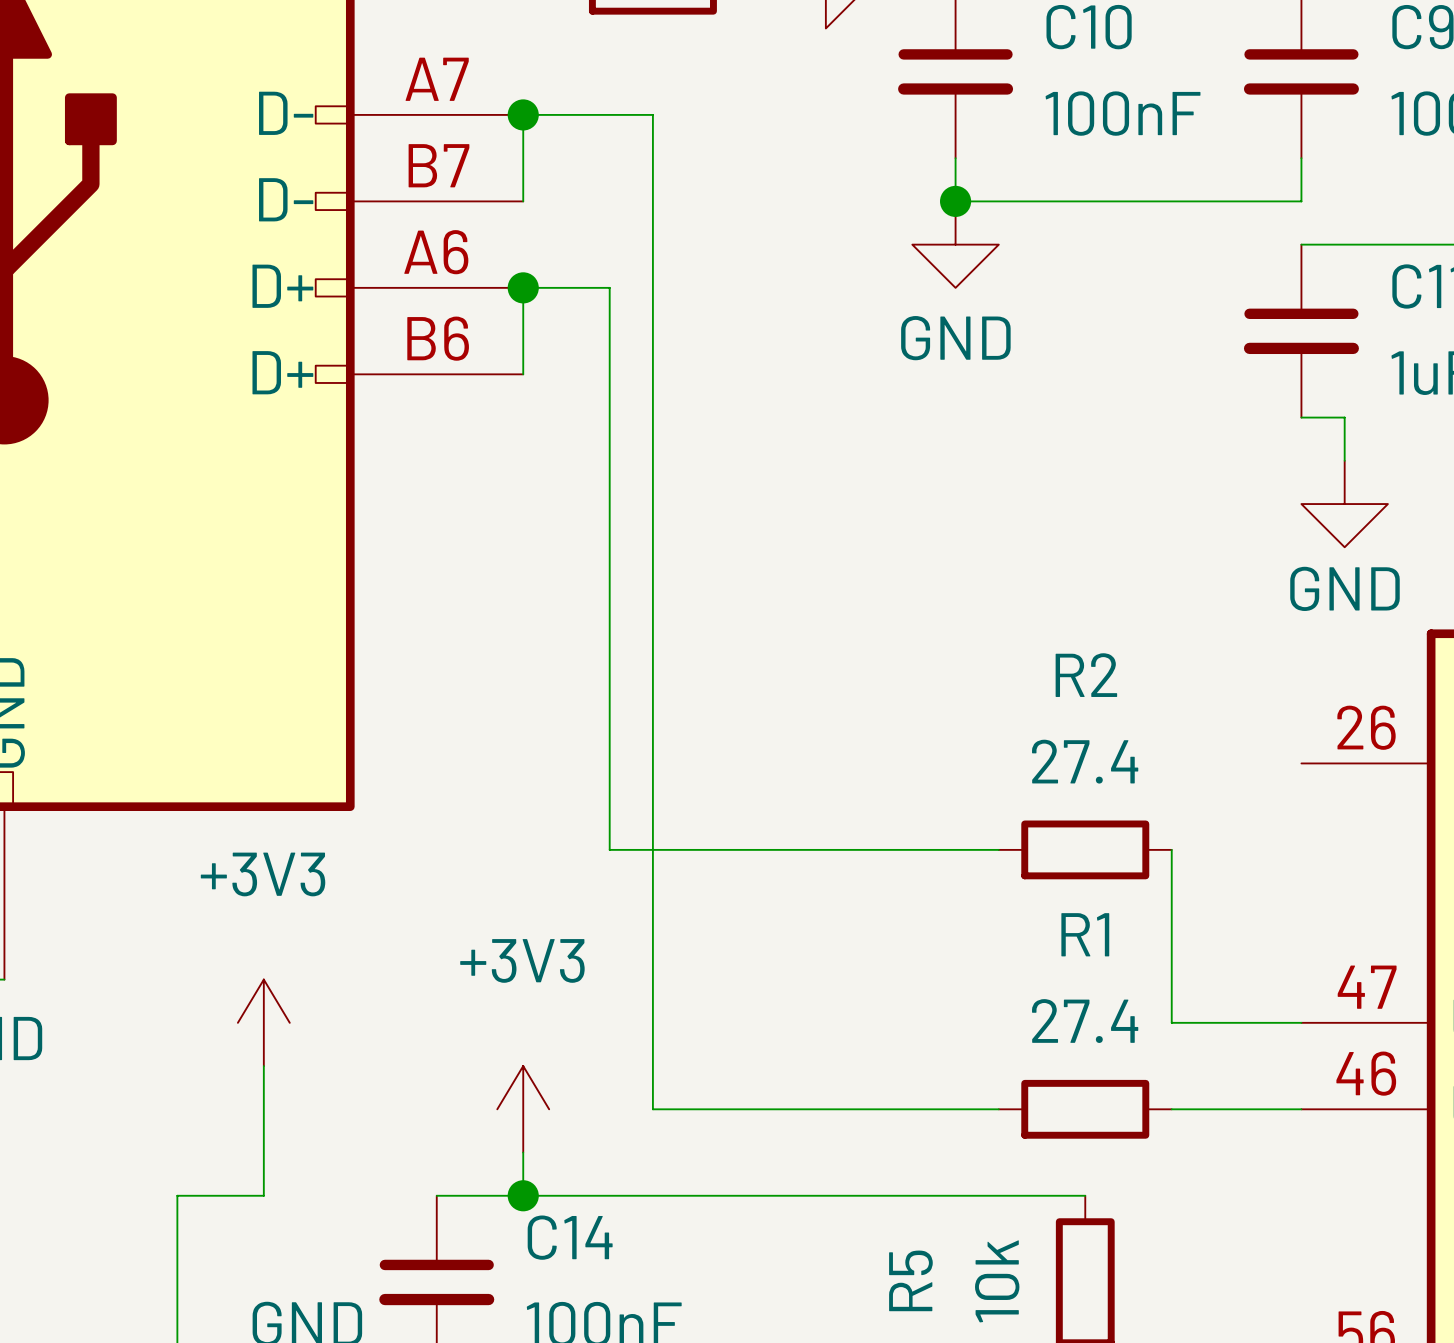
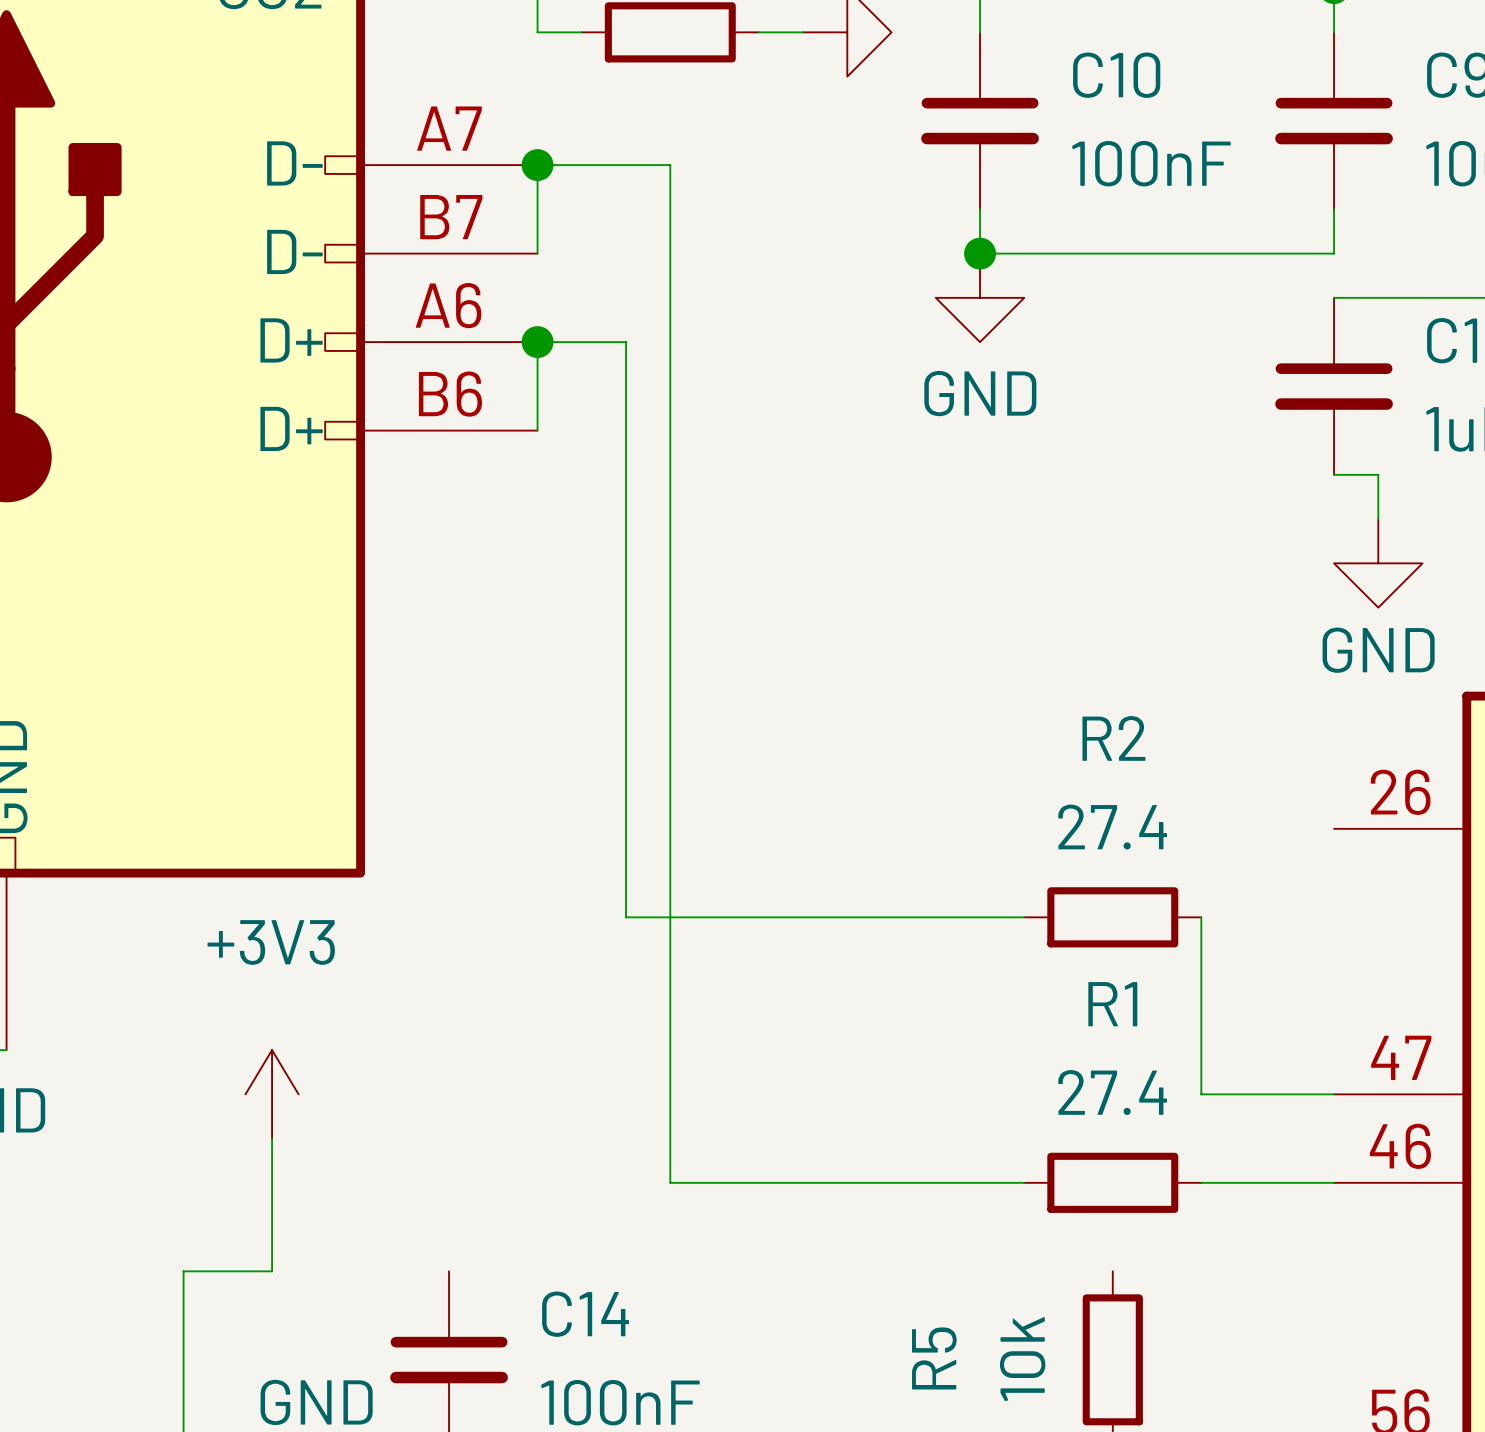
power symbol: +3V3 (523, 1109) -> none
wire: (523, 1152) (523, 1195) -> none
wire: (436, 1195) (1085, 1195) -> none
junction: (523, 1195) -> none

